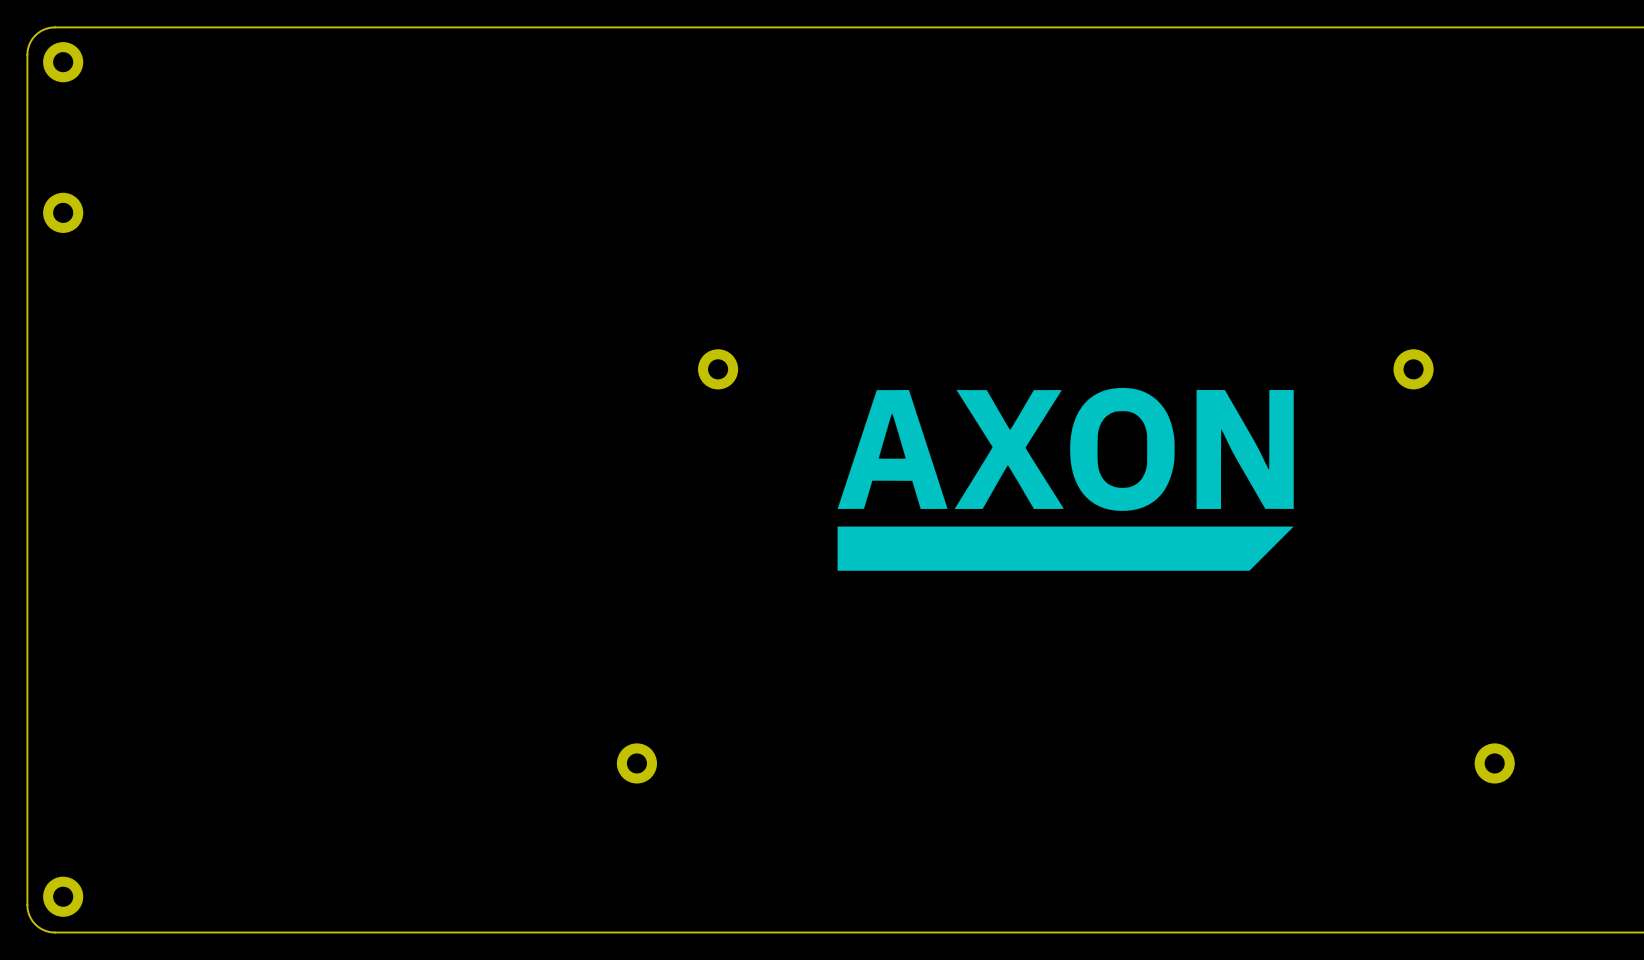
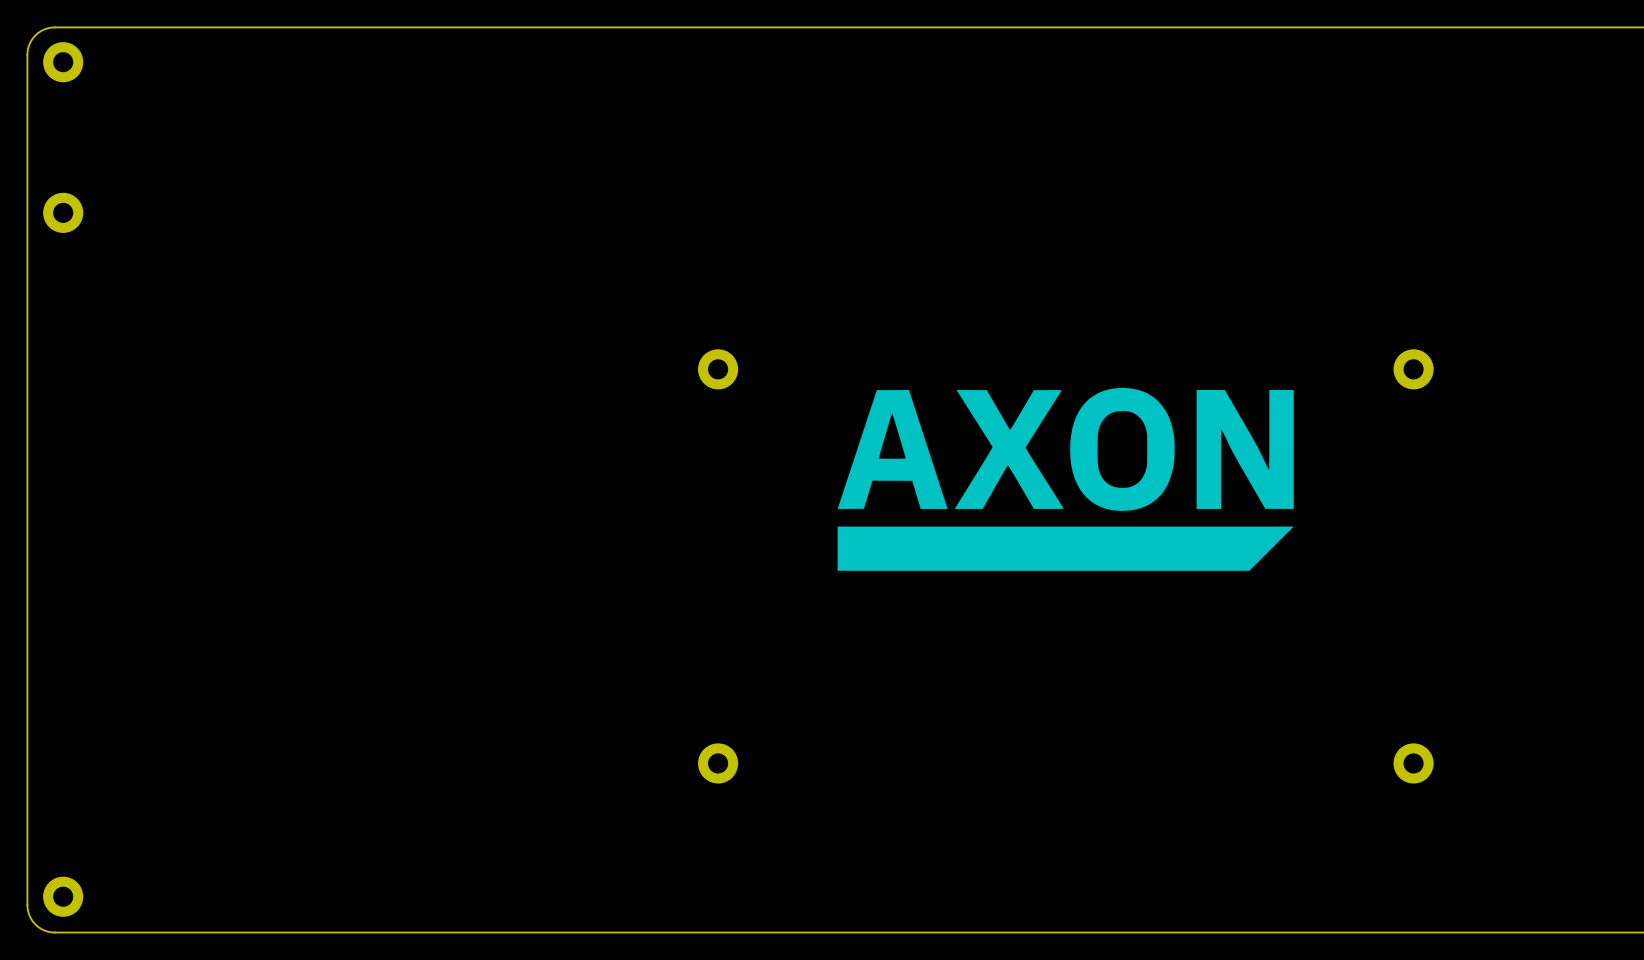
part position: (636, 763) -> (718, 763)
part position: (1494, 763) -> (1413, 763)

